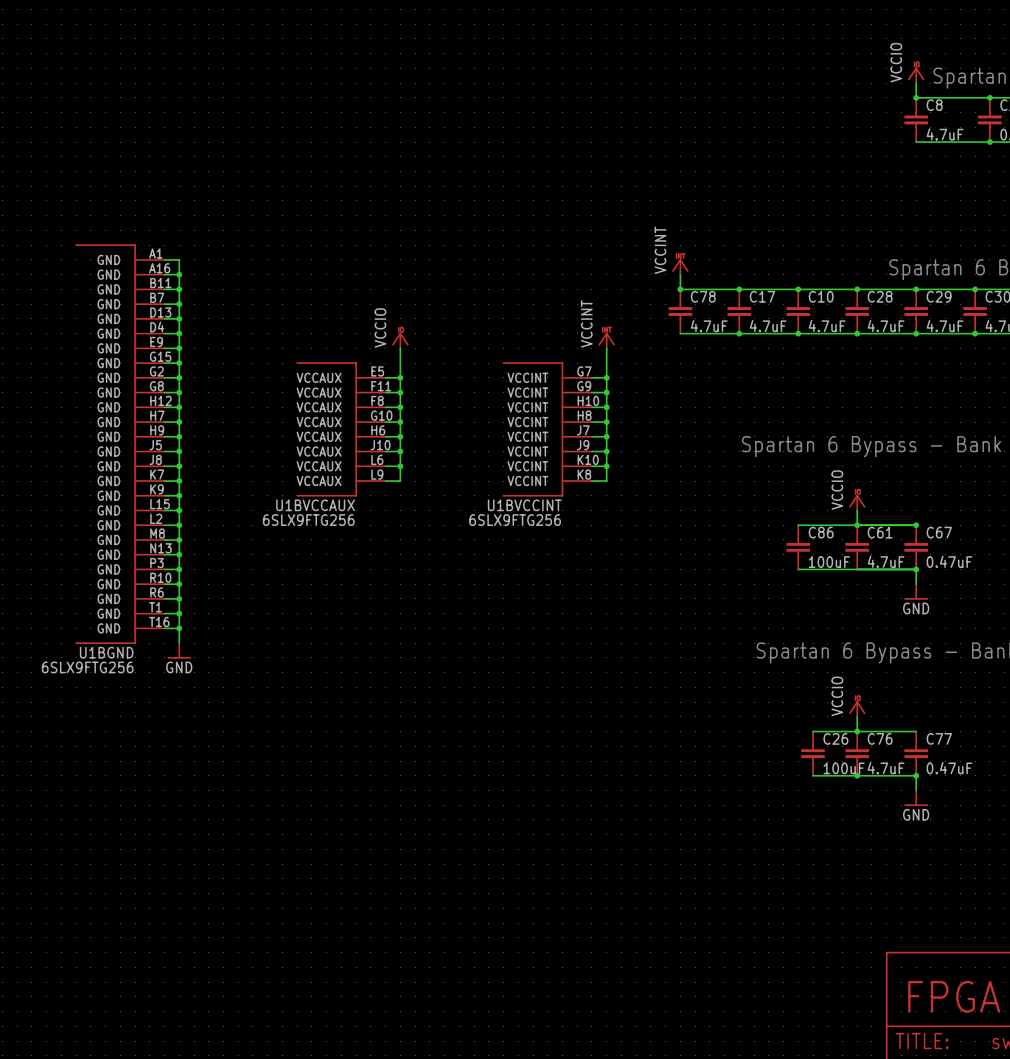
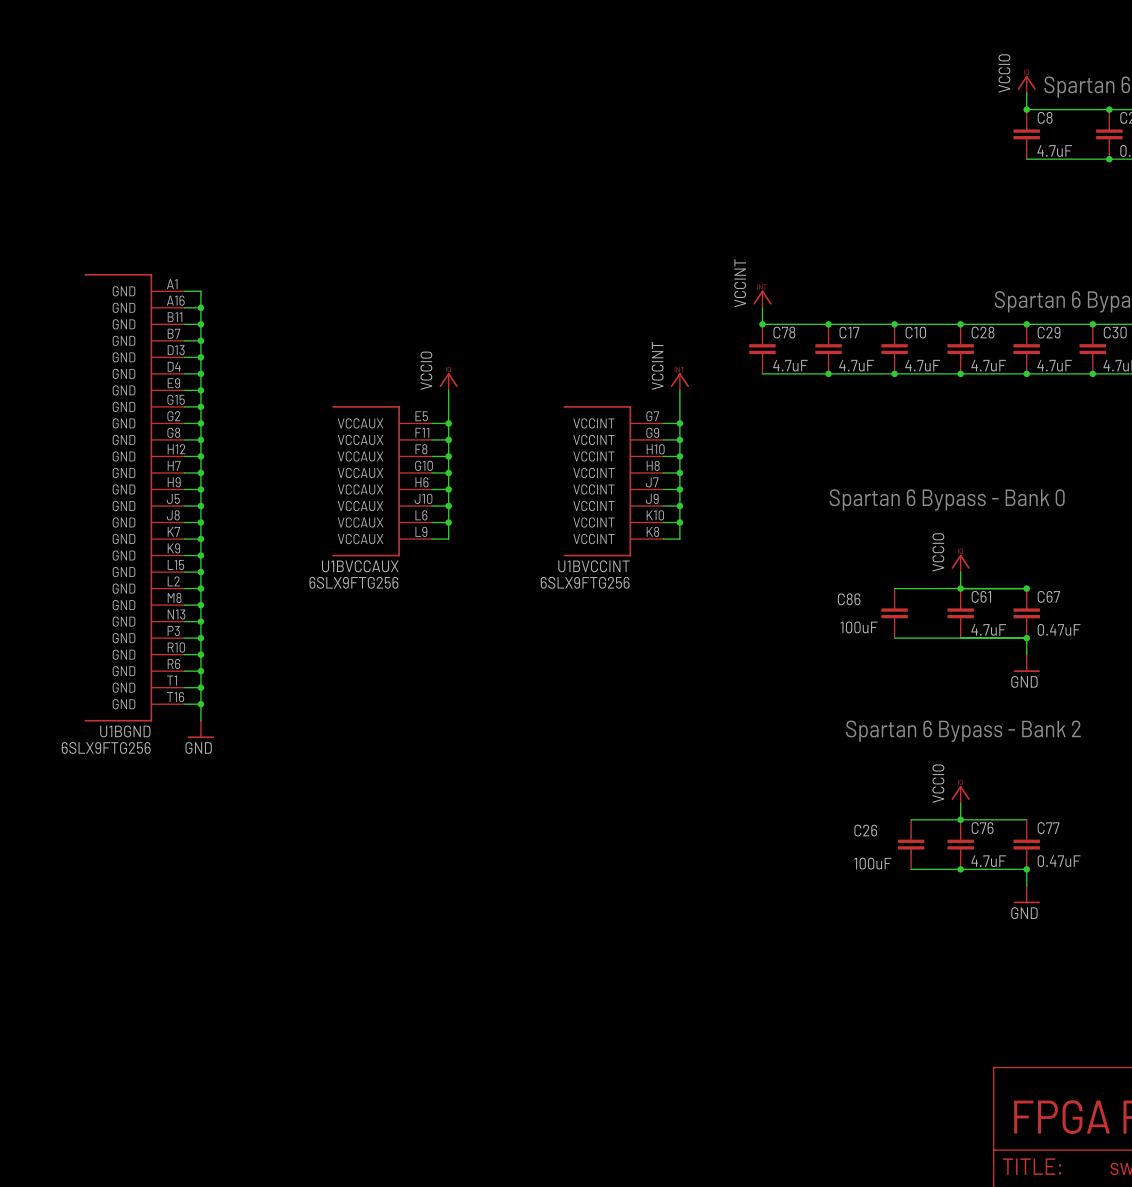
C86 name position: C86 (821, 532) -> C86 (849, 599)
C86 value position: 100uF (829, 562) -> 100uF (859, 627)
C26 name position: C26 (835, 738) -> C26 (865, 830)
C26 value position: 100uF (844, 768) -> 100uF (872, 863)

